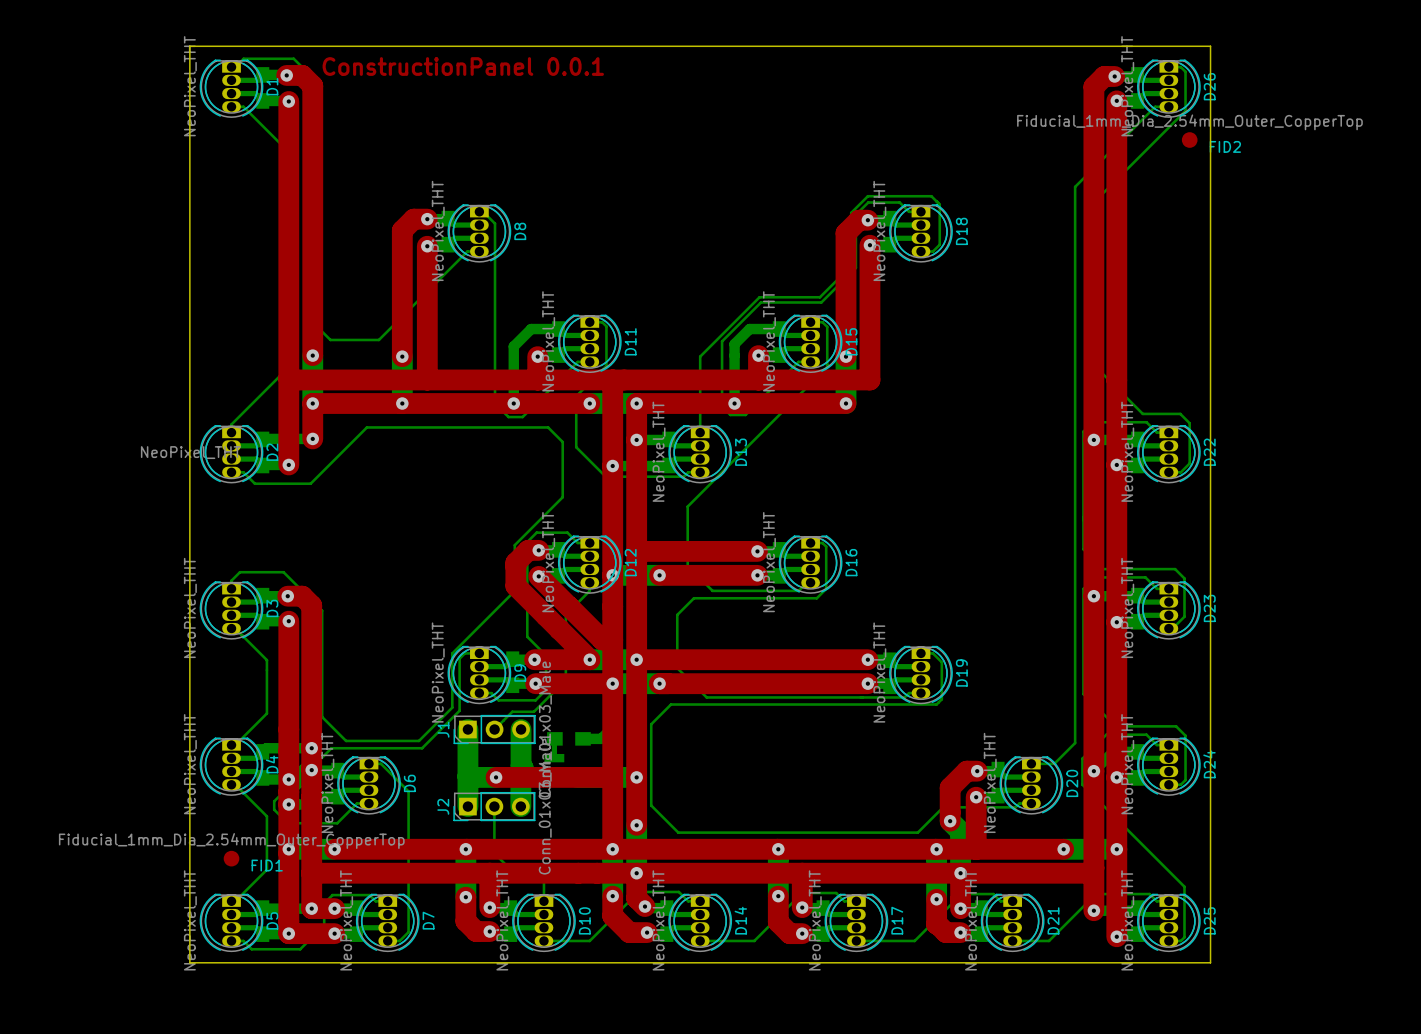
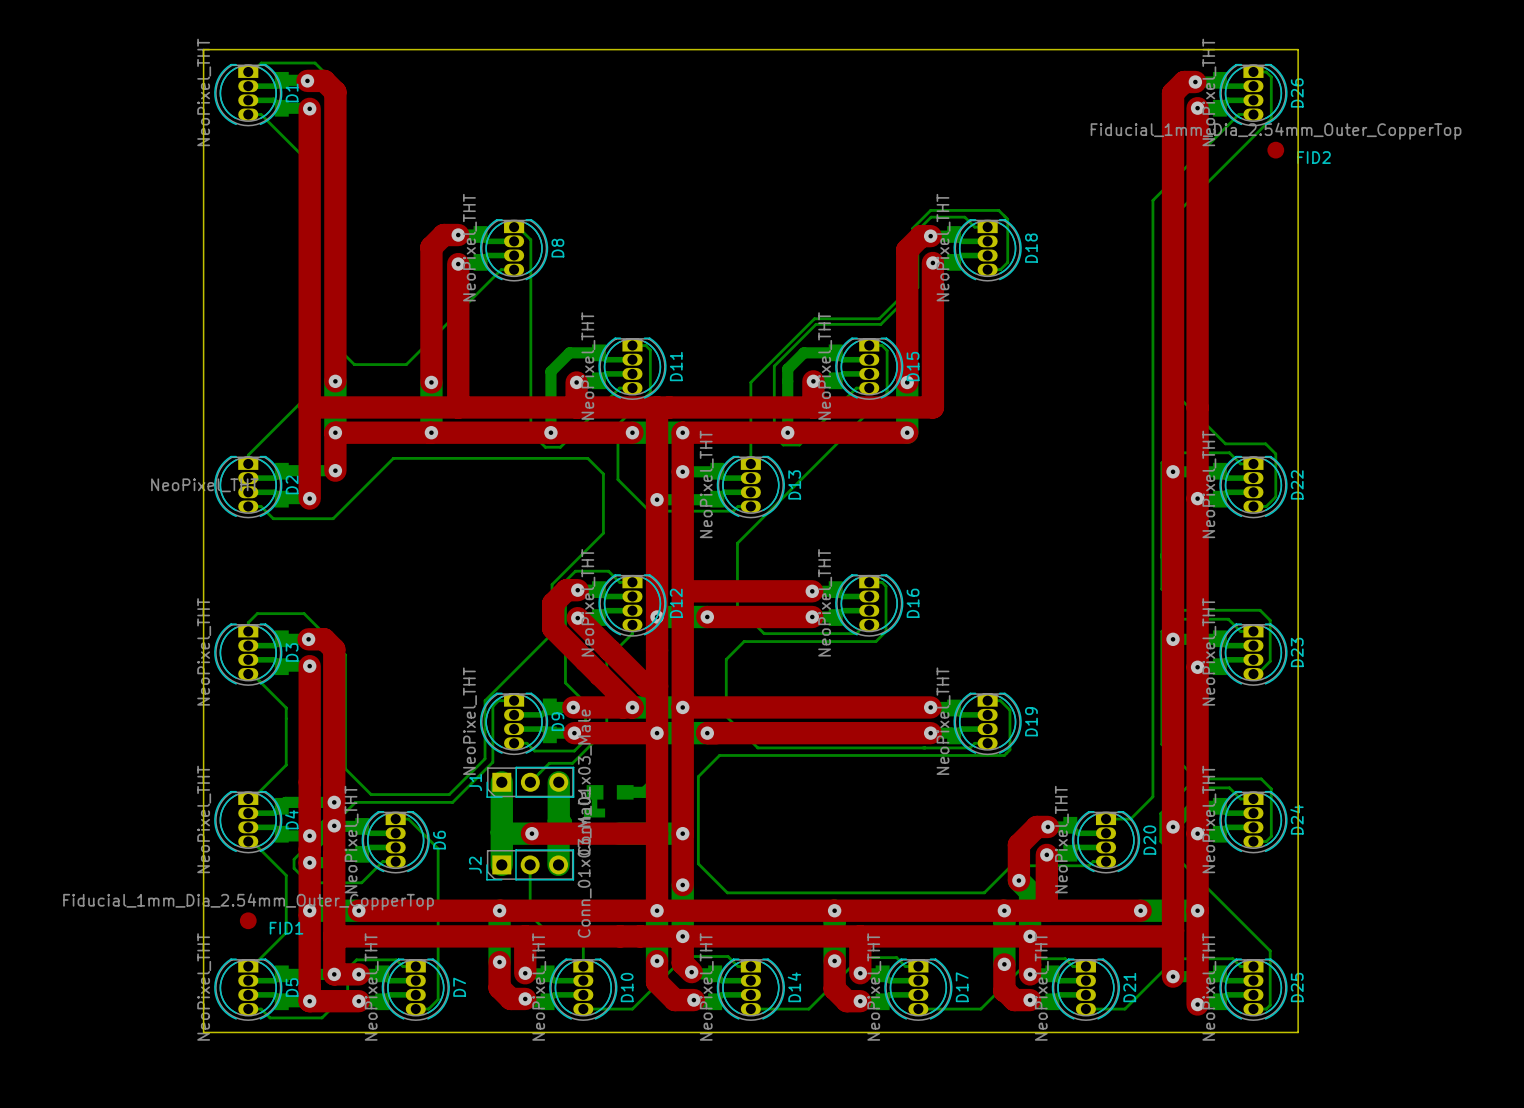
text: ConstructionPanel 0.0.1 (463, 66) -> none

